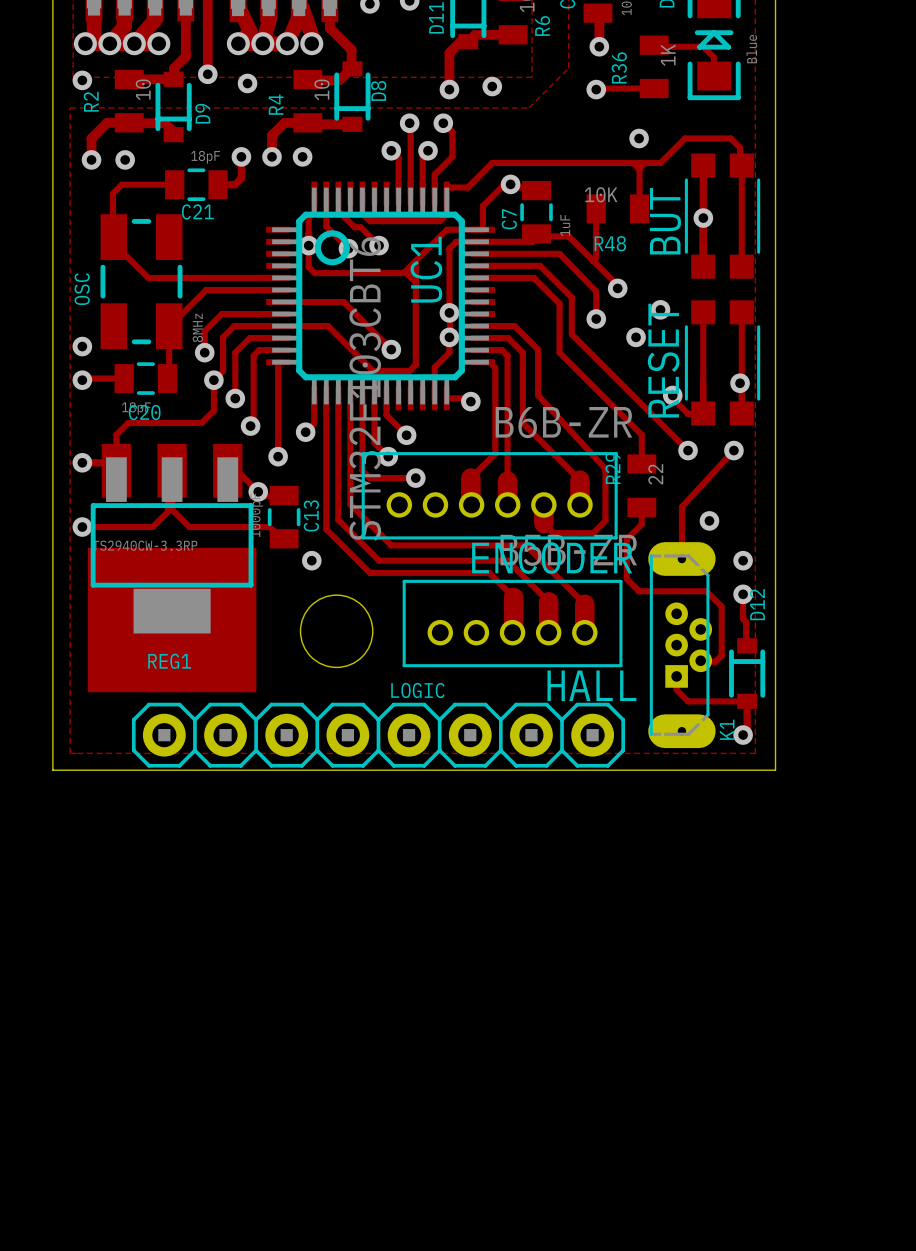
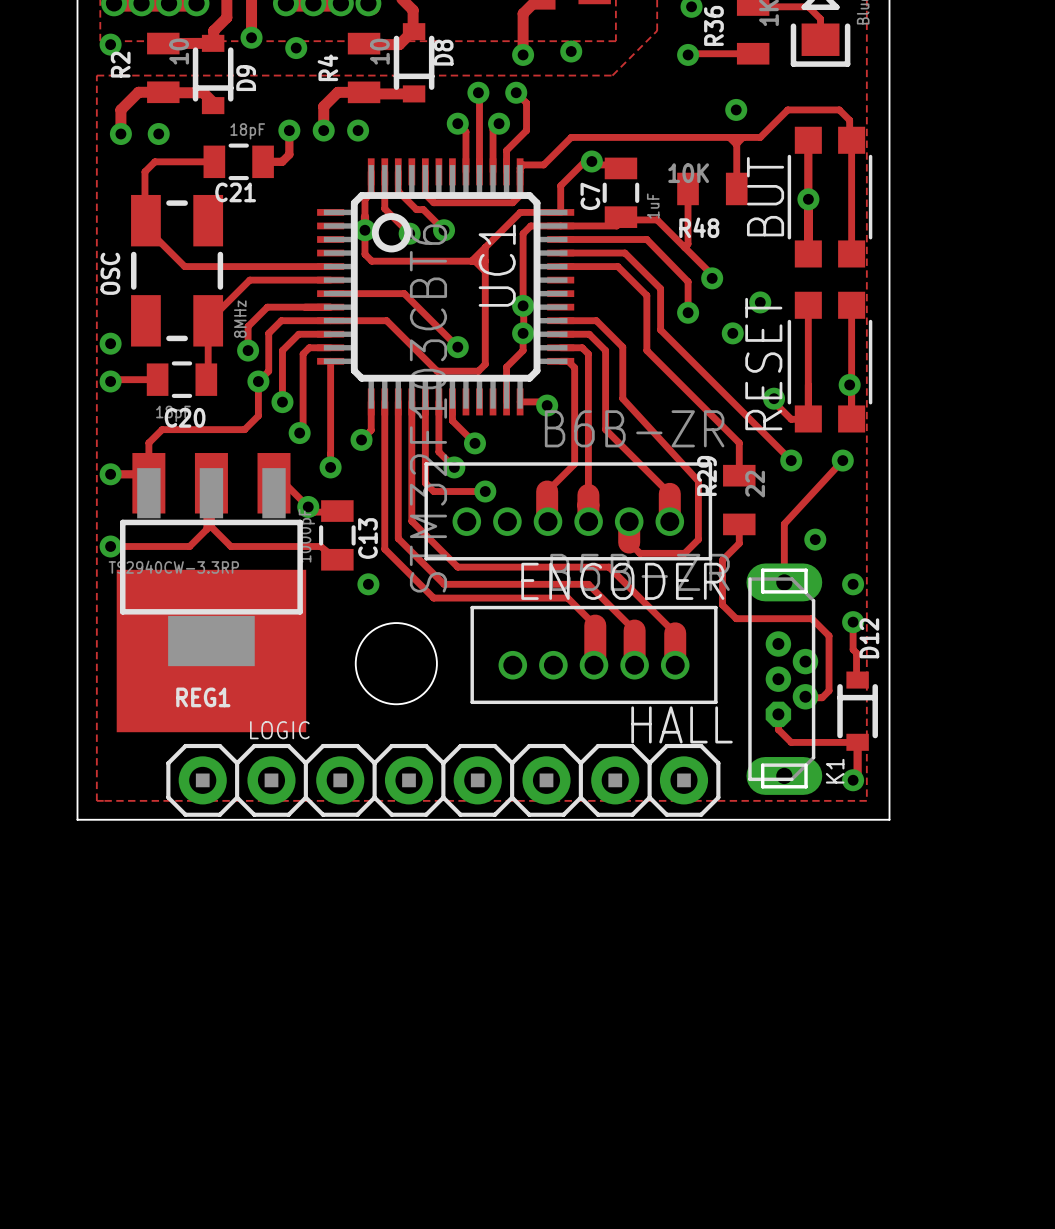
K1 footprint: [648, 542, 716, 749] -> [746, 563, 823, 795]
LOGIC name position: LOGIC (417, 690) -> LOGIC (279, 730)

